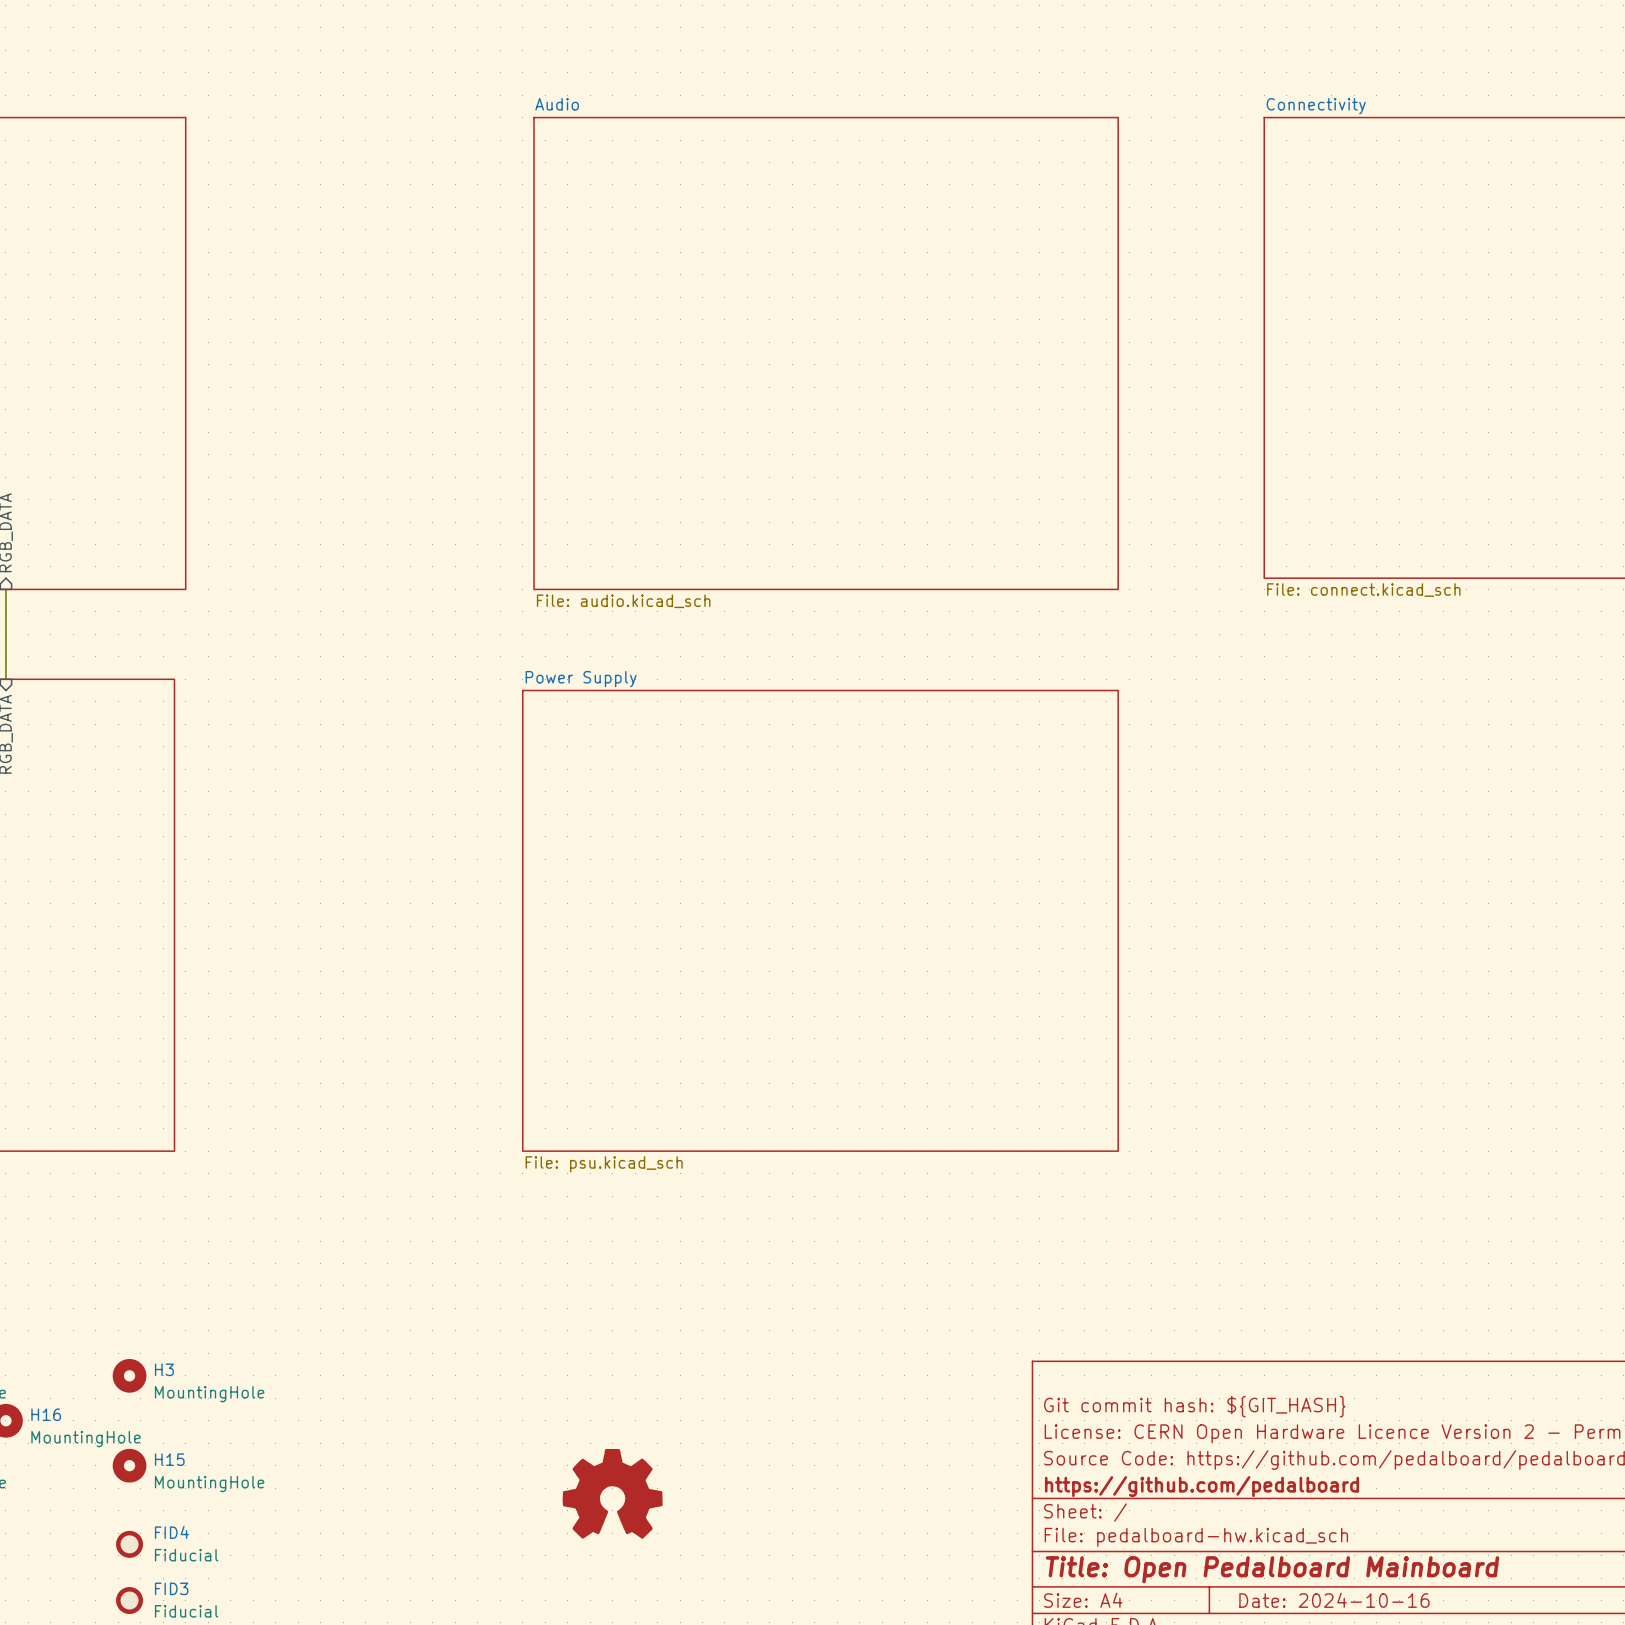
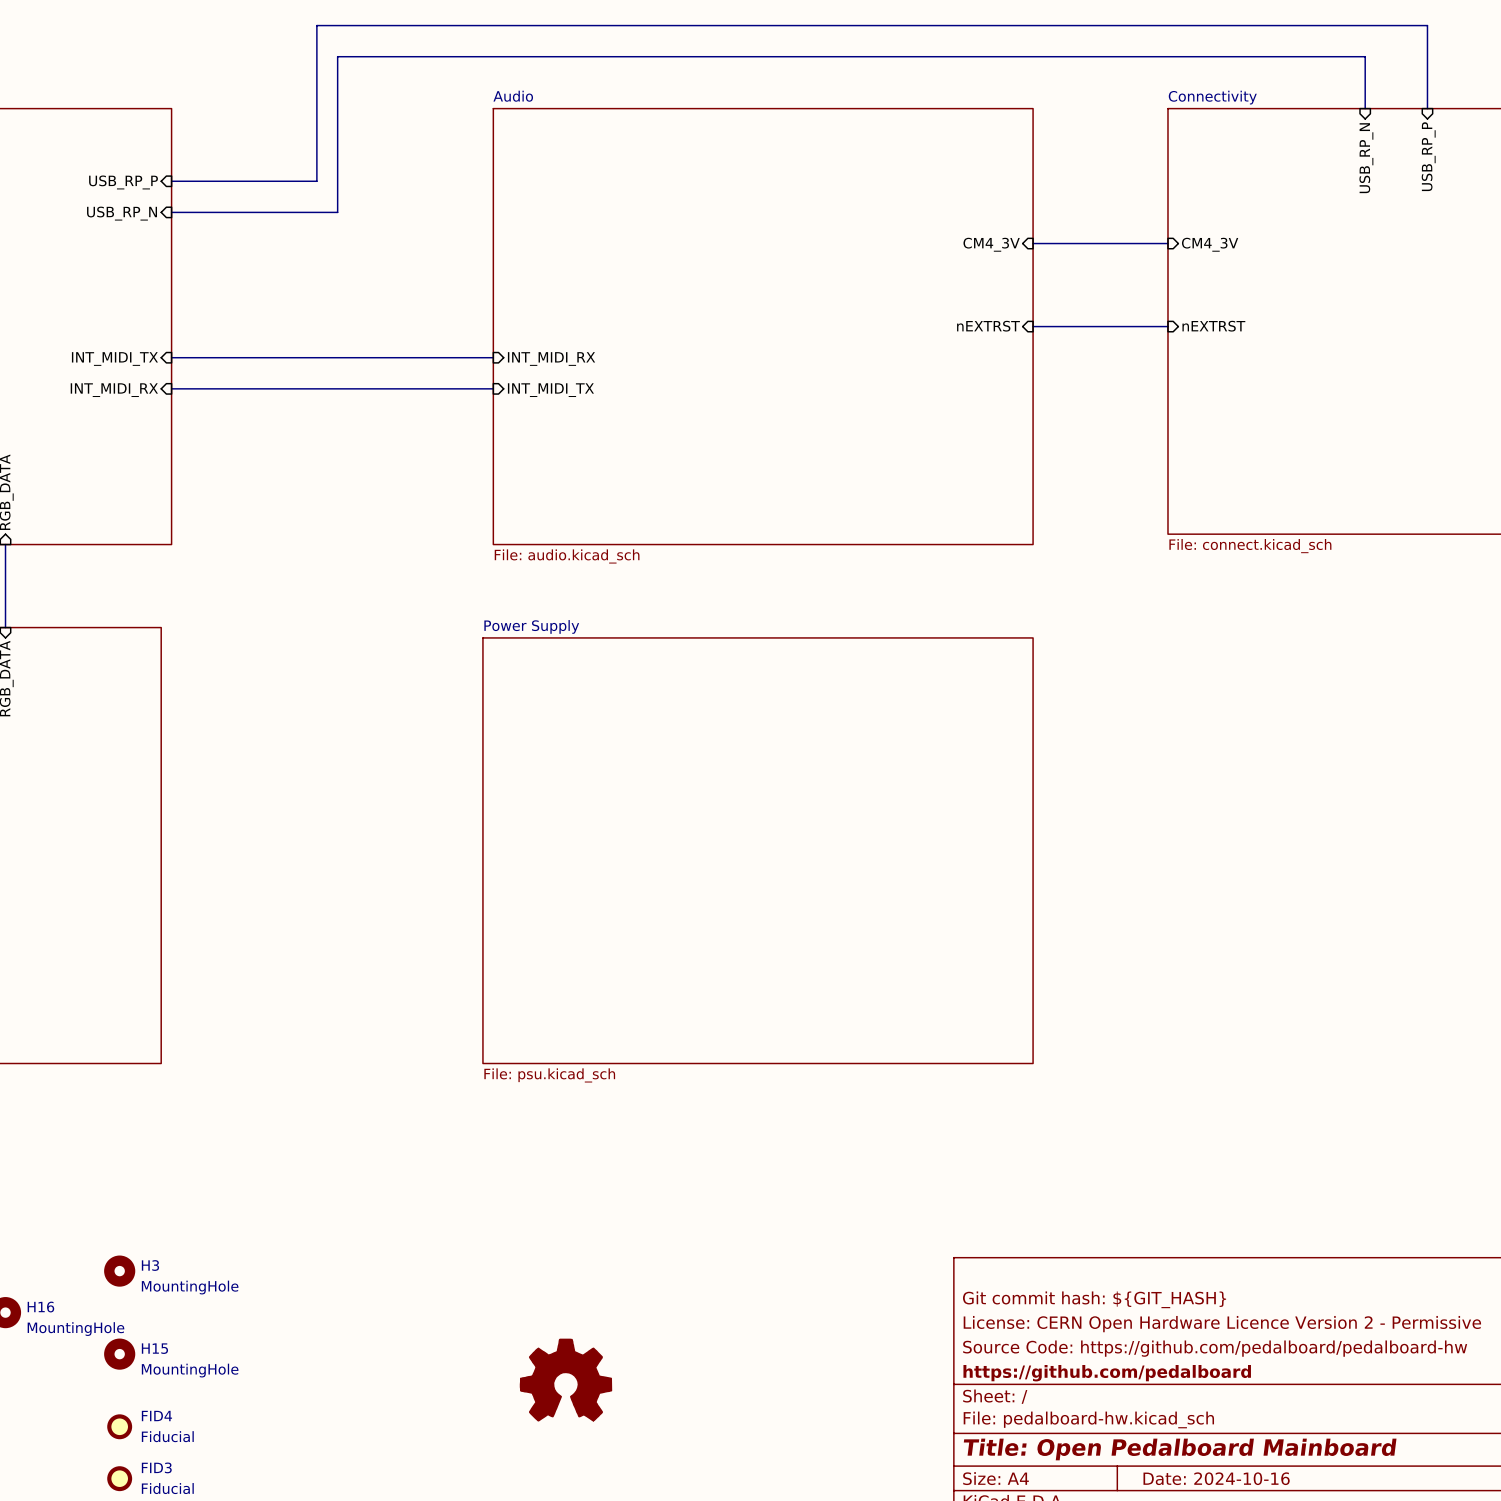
wire: none -> (1365, 108) (1365, 56) (337, 56) (337, 212) (171, 212)
wire: none -> (1427, 108) (1427, 25) (316, 25) (316, 181) (171, 181)
sheet pin: none -> USB_RP_P (1428, 156)
sheet pin: none -> USB_RP_N (1366, 158)
sheet pin: none -> USB_RP_P (123, 182)
sheet pin: none -> USB_RP_N (122, 213)
sheet pin: none -> CM4_3V (991, 244)
wire: none -> (1033, 243) (1167, 243)
sheet pin: none -> CM4_3V (1210, 244)
sheet pin: none -> nEXTRST (988, 326)
wire: none -> (1033, 326) (1167, 326)
sheet pin: none -> nEXTRST (1213, 326)
sheet pin: none -> INT_MIDI_TX (114, 359)
wire: none -> (171, 357) (493, 357)
sheet pin: none -> INT_MIDI_RX (551, 359)
wire: none -> (171, 388) (493, 388)
sheet pin: none -> INT_MIDI_RX (114, 390)
sheet pin: none -> INT_MIDI_TX (550, 390)

